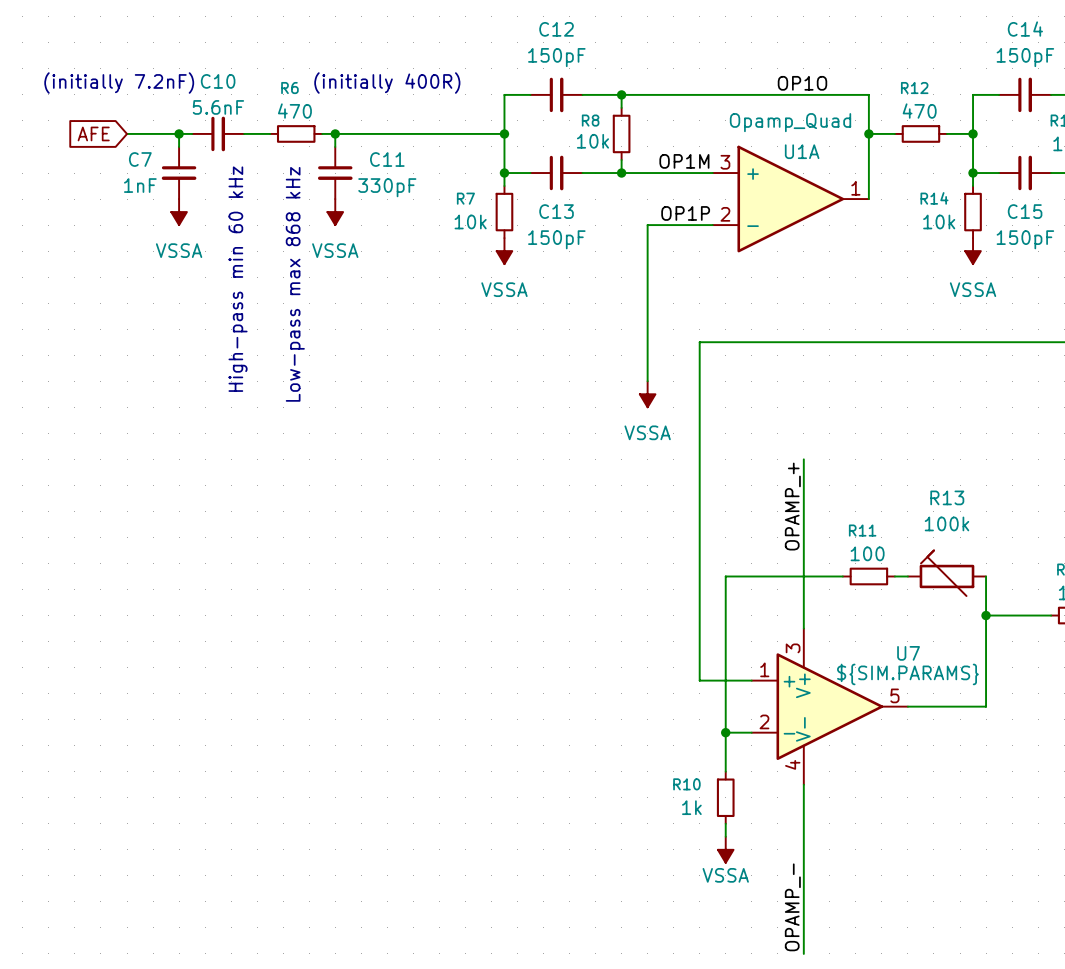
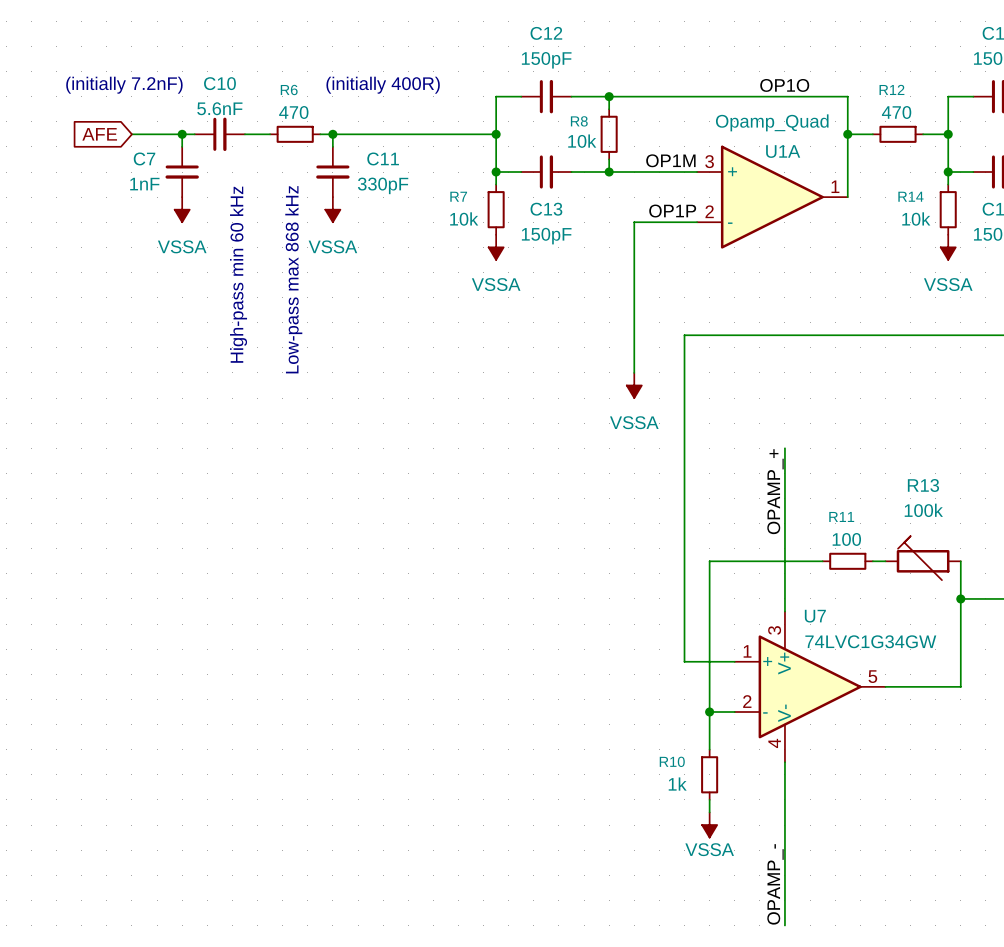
U7 name position: U7 (908, 653) -> U7 (815, 616)
U7 value: ${SIM.PARAMS} (907, 674) -> 74LVC1G34GW (870, 641)

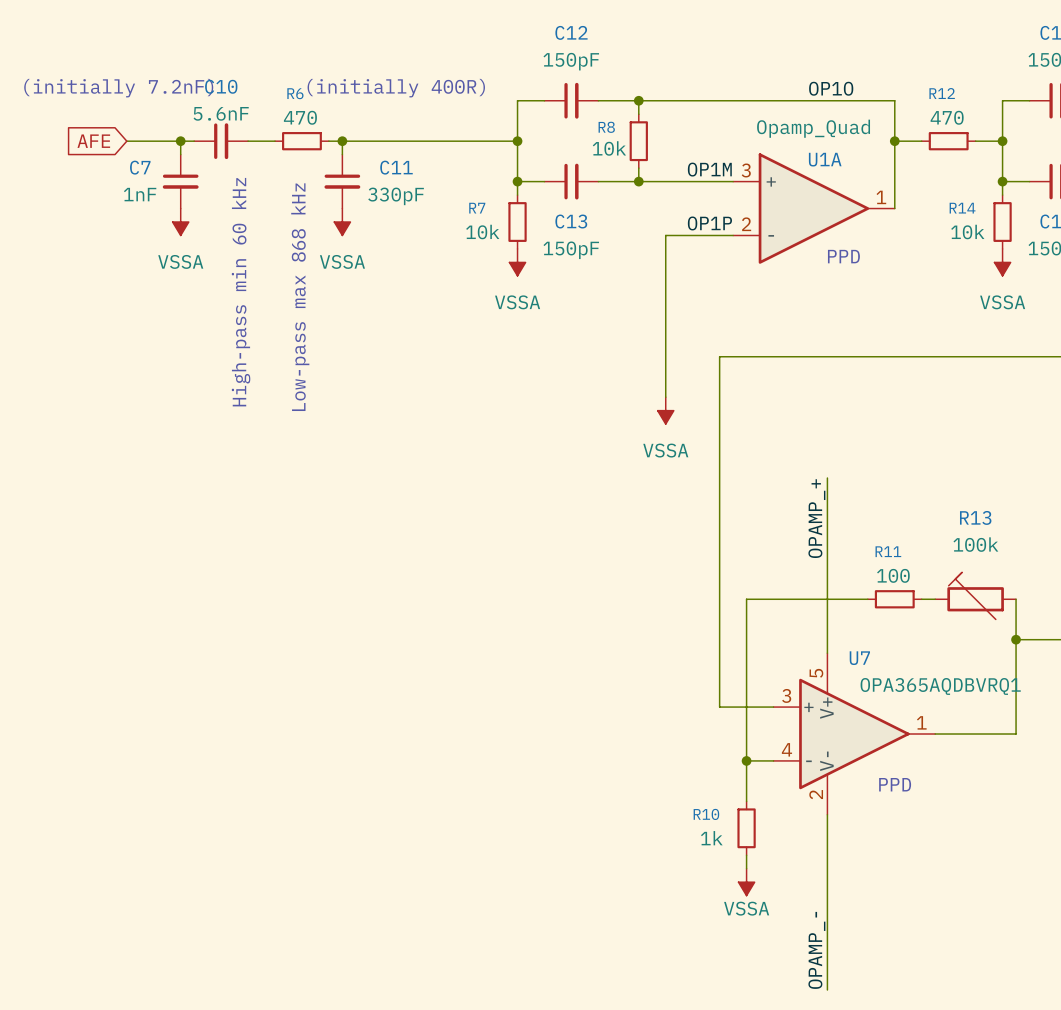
text: none -> PPD (843, 256)
U7 pin number: 3 (774, 630) -> 5 (816, 673)
U7 value: 74LVC1G34GW (870, 641) -> OPA365AQDBVRQ1 (940, 686)
U7 pin number: 1 (747, 651) -> 3 (786, 695)
U7 pin number: 5 (872, 676) -> 1 (921, 722)
U7 pin number: 2 (747, 701) -> 4 (786, 749)
text: none -> PPD (895, 784)
U7 pin number: 4 (774, 743) -> 2 (816, 794)

